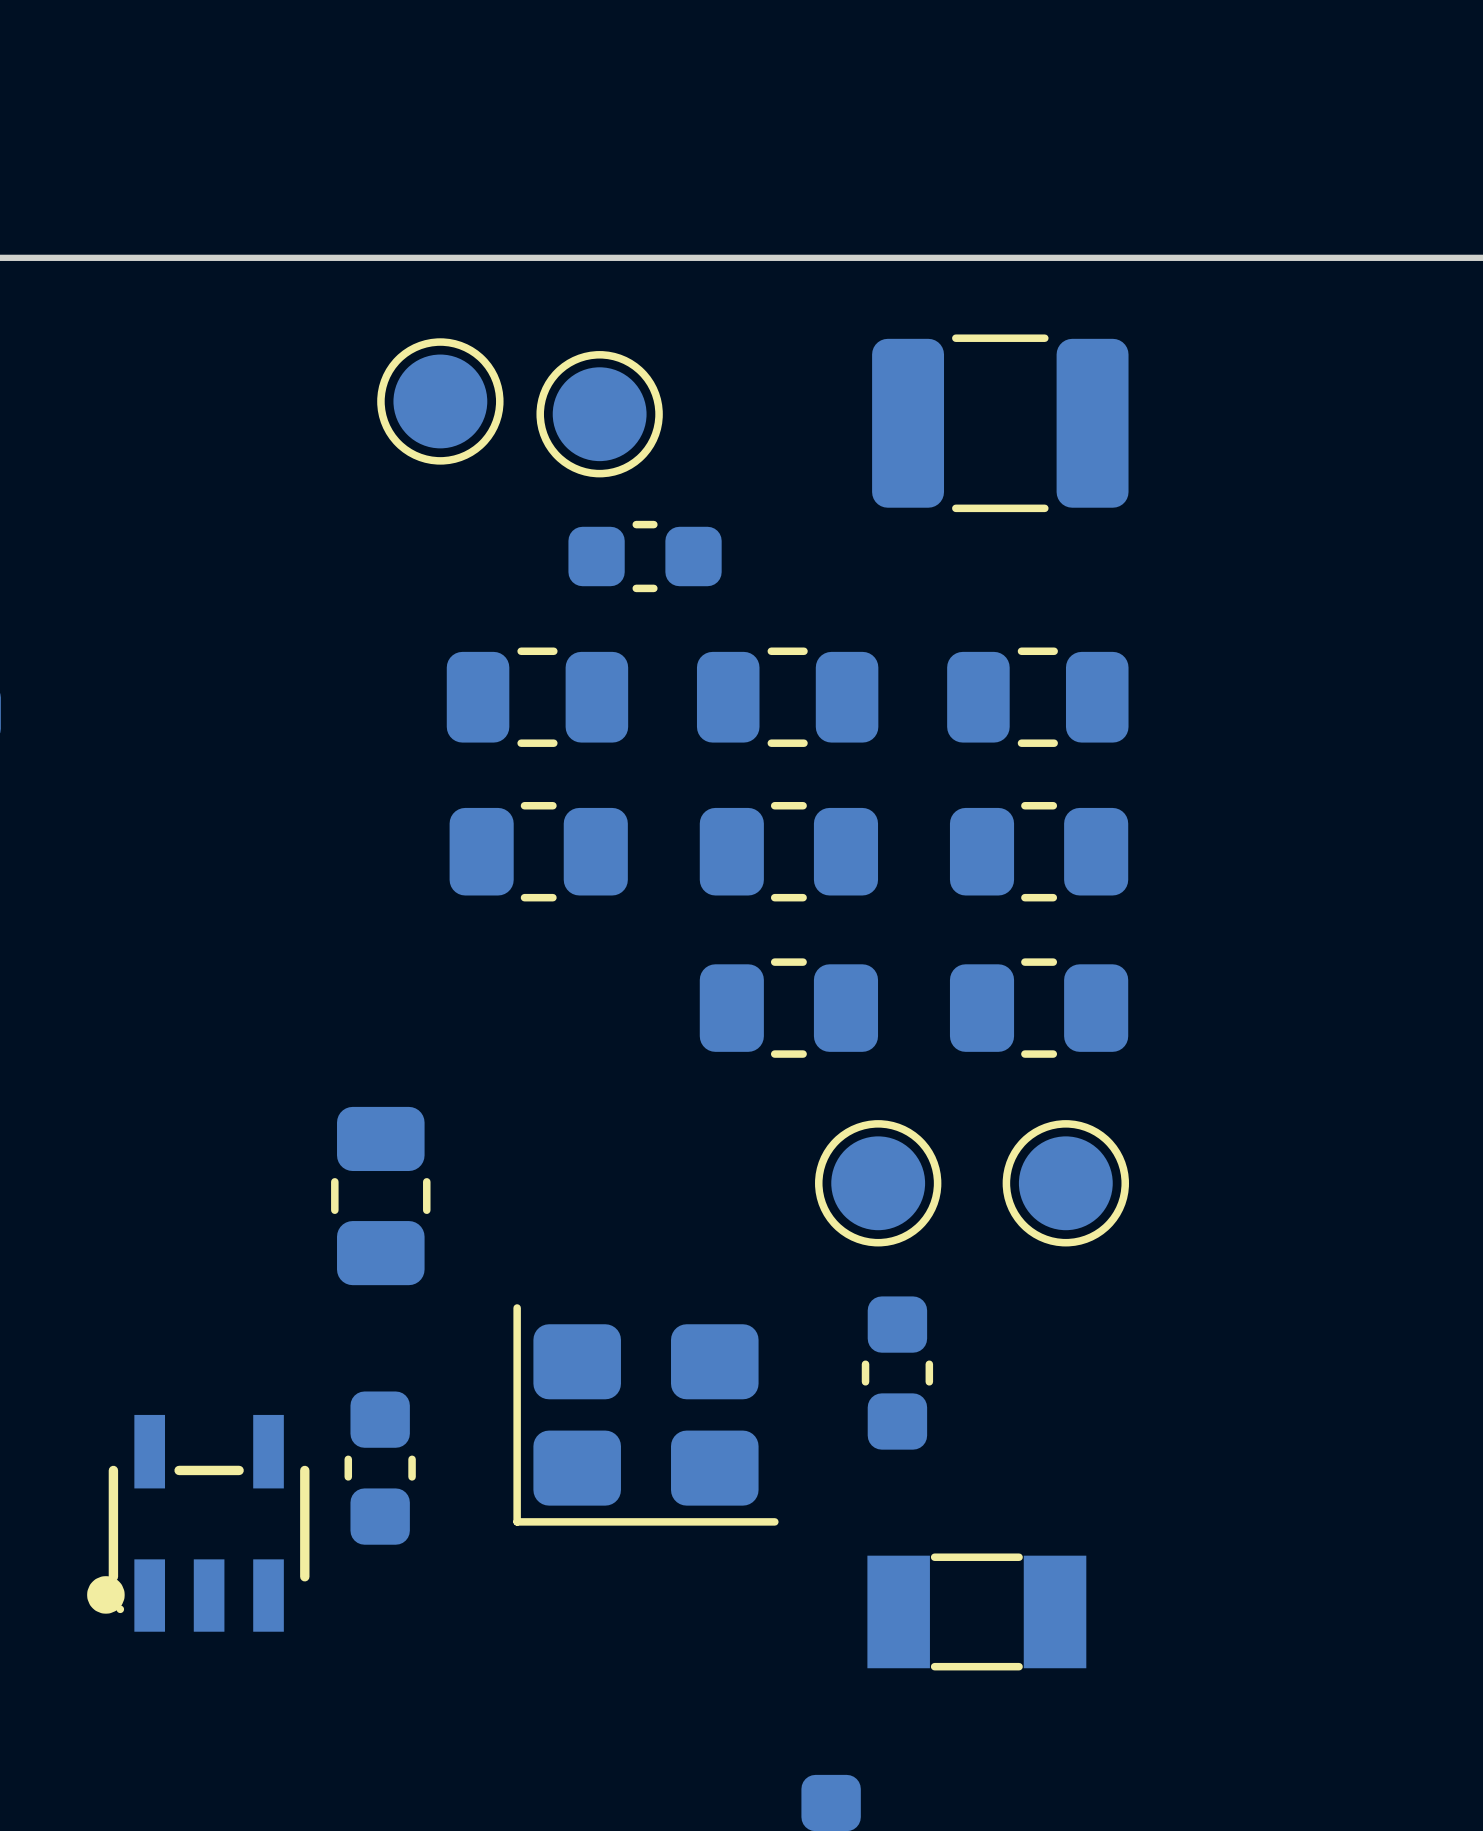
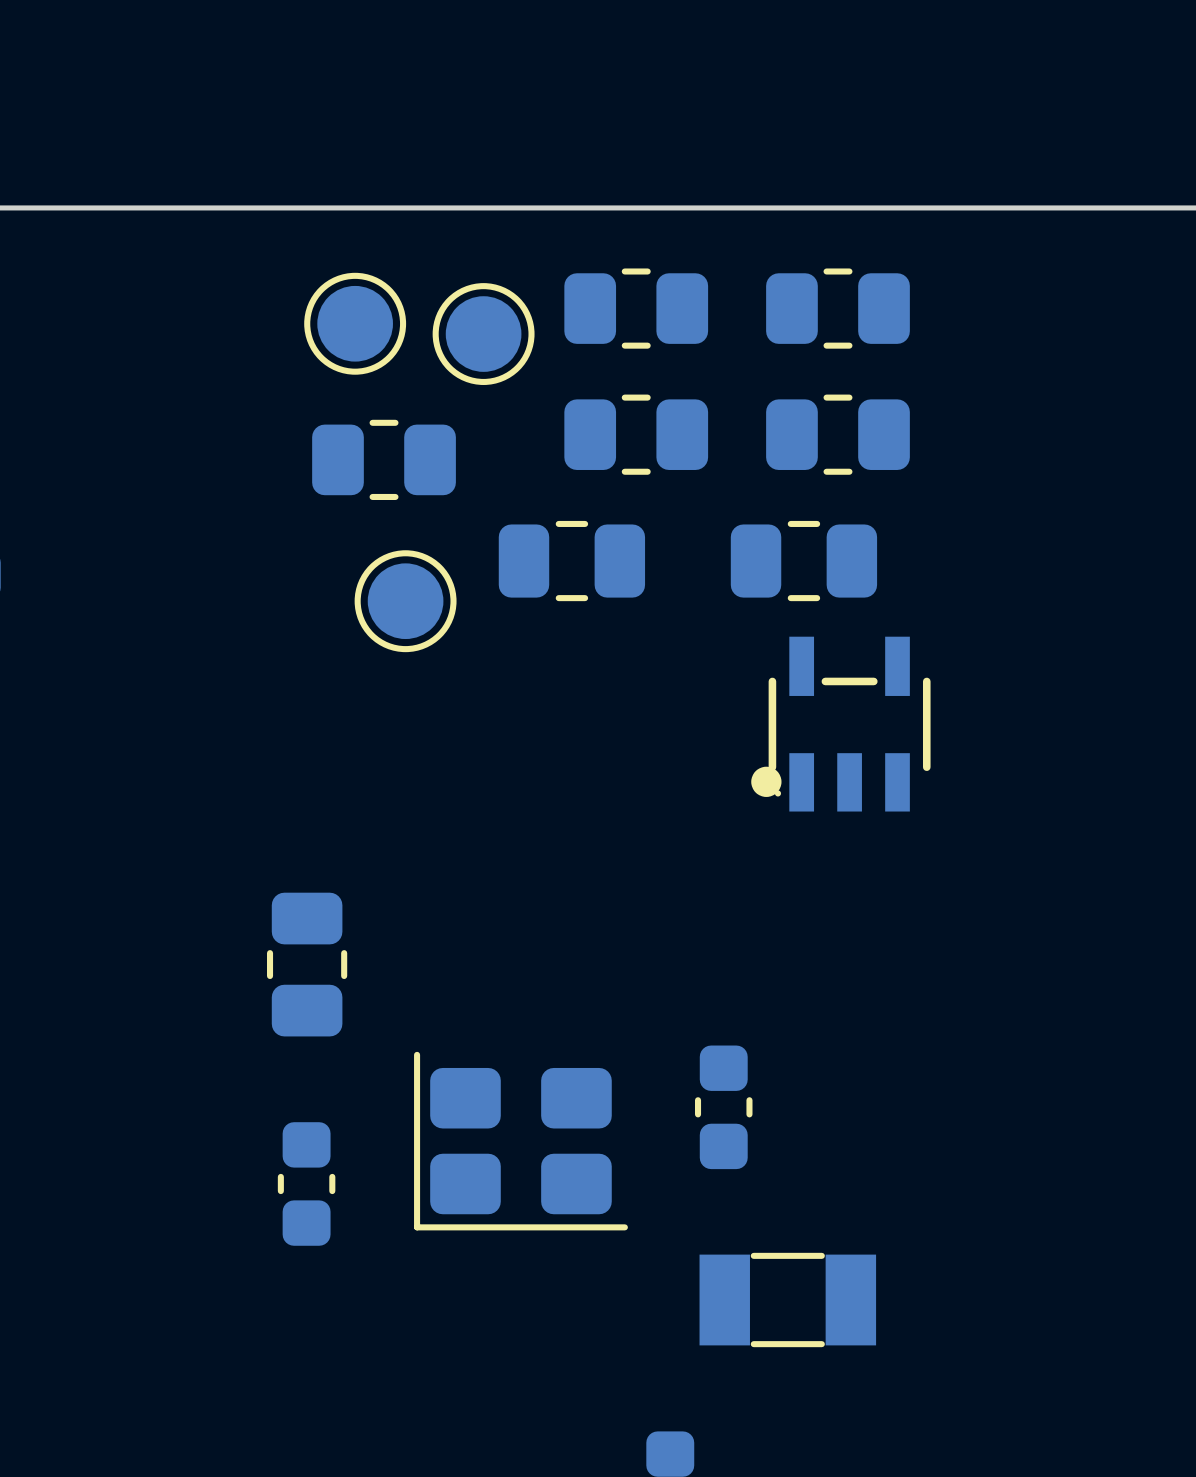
part footprint: [872, 334, 1129, 513] -> [766, 268, 910, 349]
part: none -> (636, 308)
part: none -> (636, 434)
part: none -> (837, 434)
part: (645, 556) -> none
part: none -> (384, 459)
part: (537, 697) -> none
part position: (787, 697) -> (571, 561)
part position: (1037, 697) -> (803, 561)
part: none -> (405, 601)
part footprint: [949, 801, 1129, 902] -> [751, 636, 931, 812]
part: (538, 851) -> none
part: (788, 851) -> none
part: (788, 1008) -> none
part: (1039, 1008) -> none
part: (878, 1183) -> none
part: (1065, 1183) -> none
part: (198, 1523) -> none

